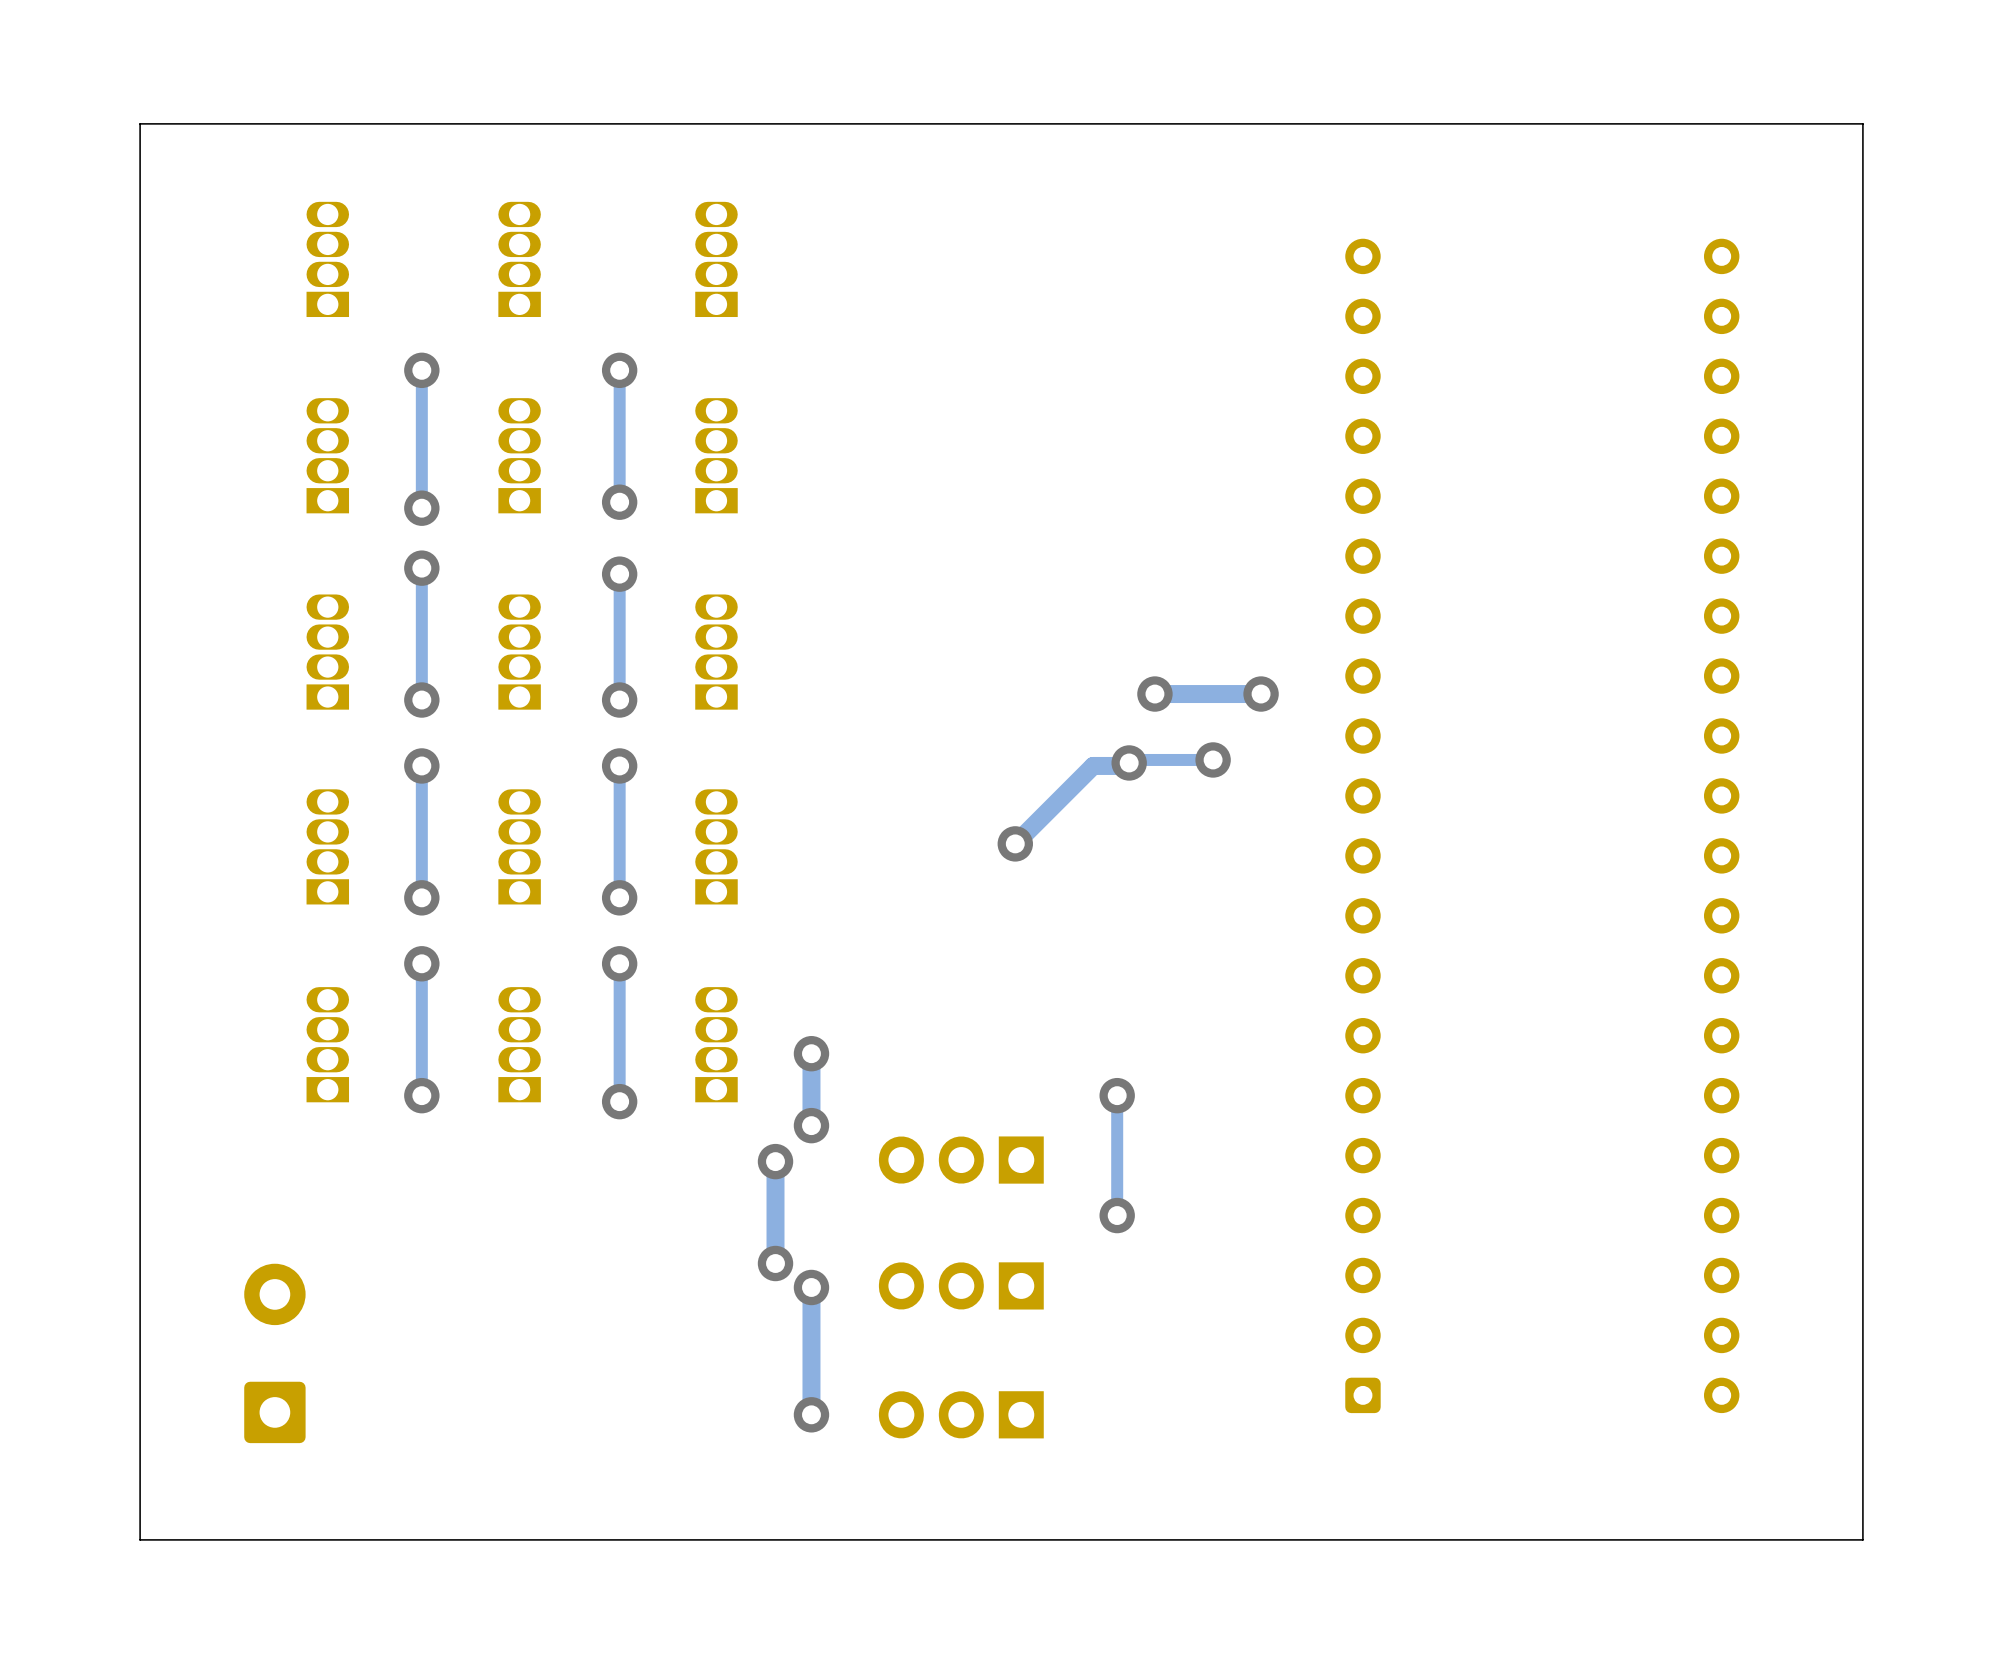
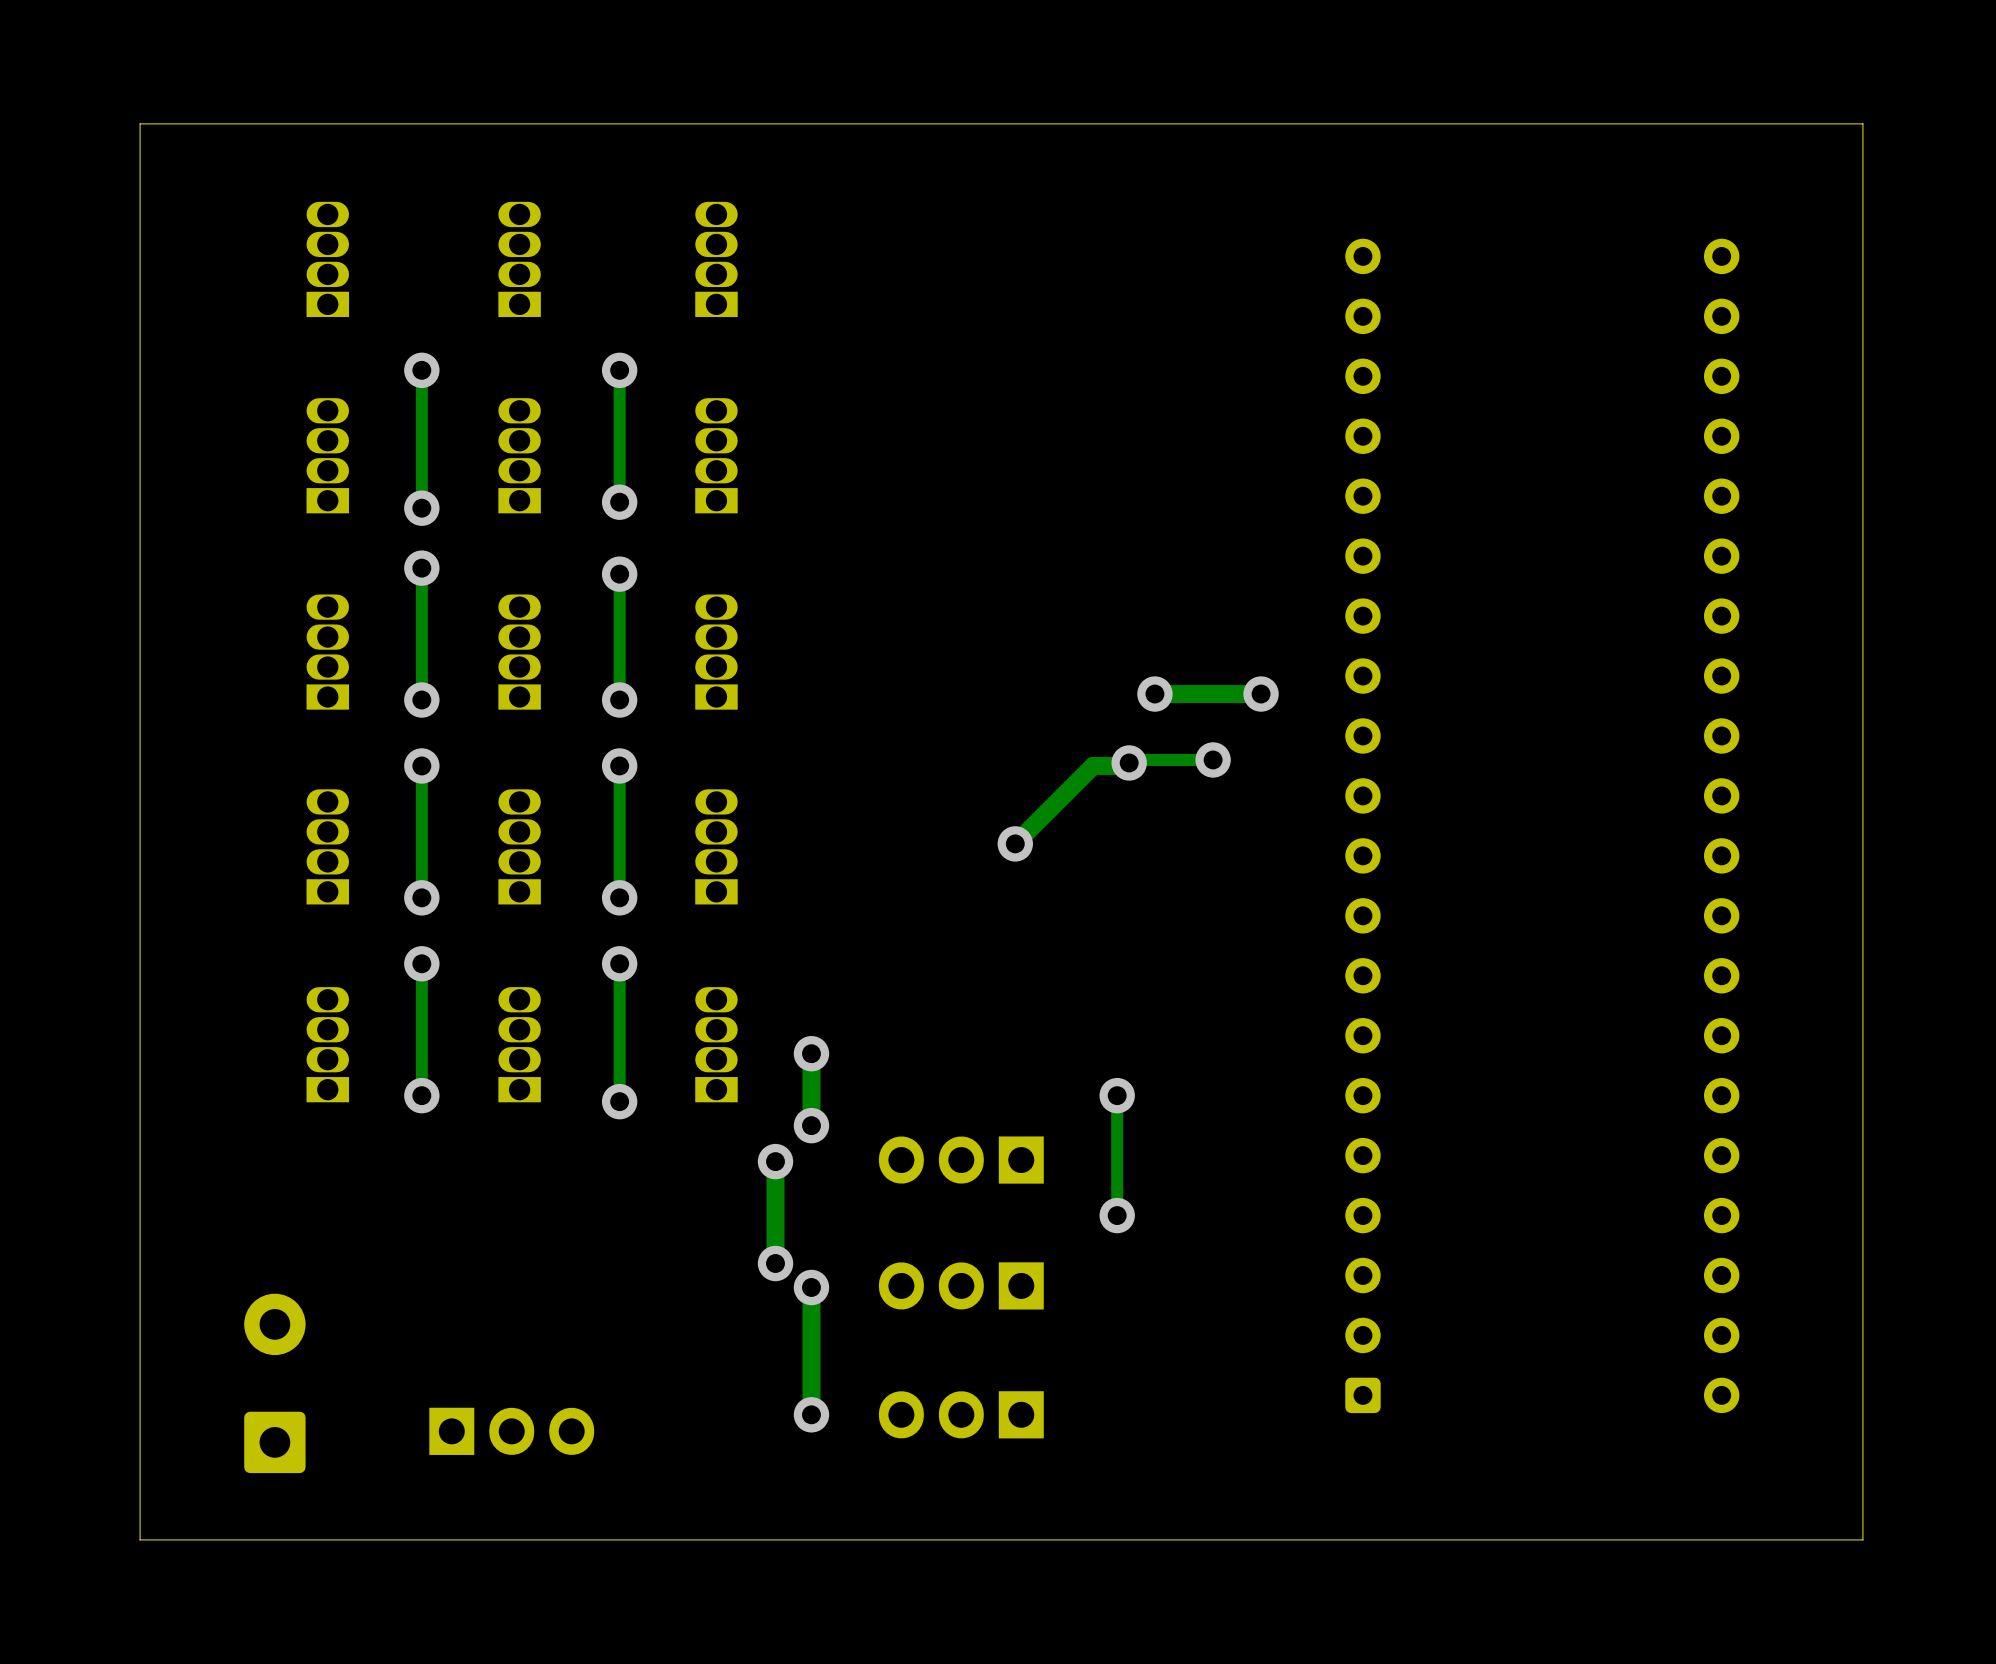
part position: (274, 1353) -> (274, 1383)
part: none -> (511, 1431)

